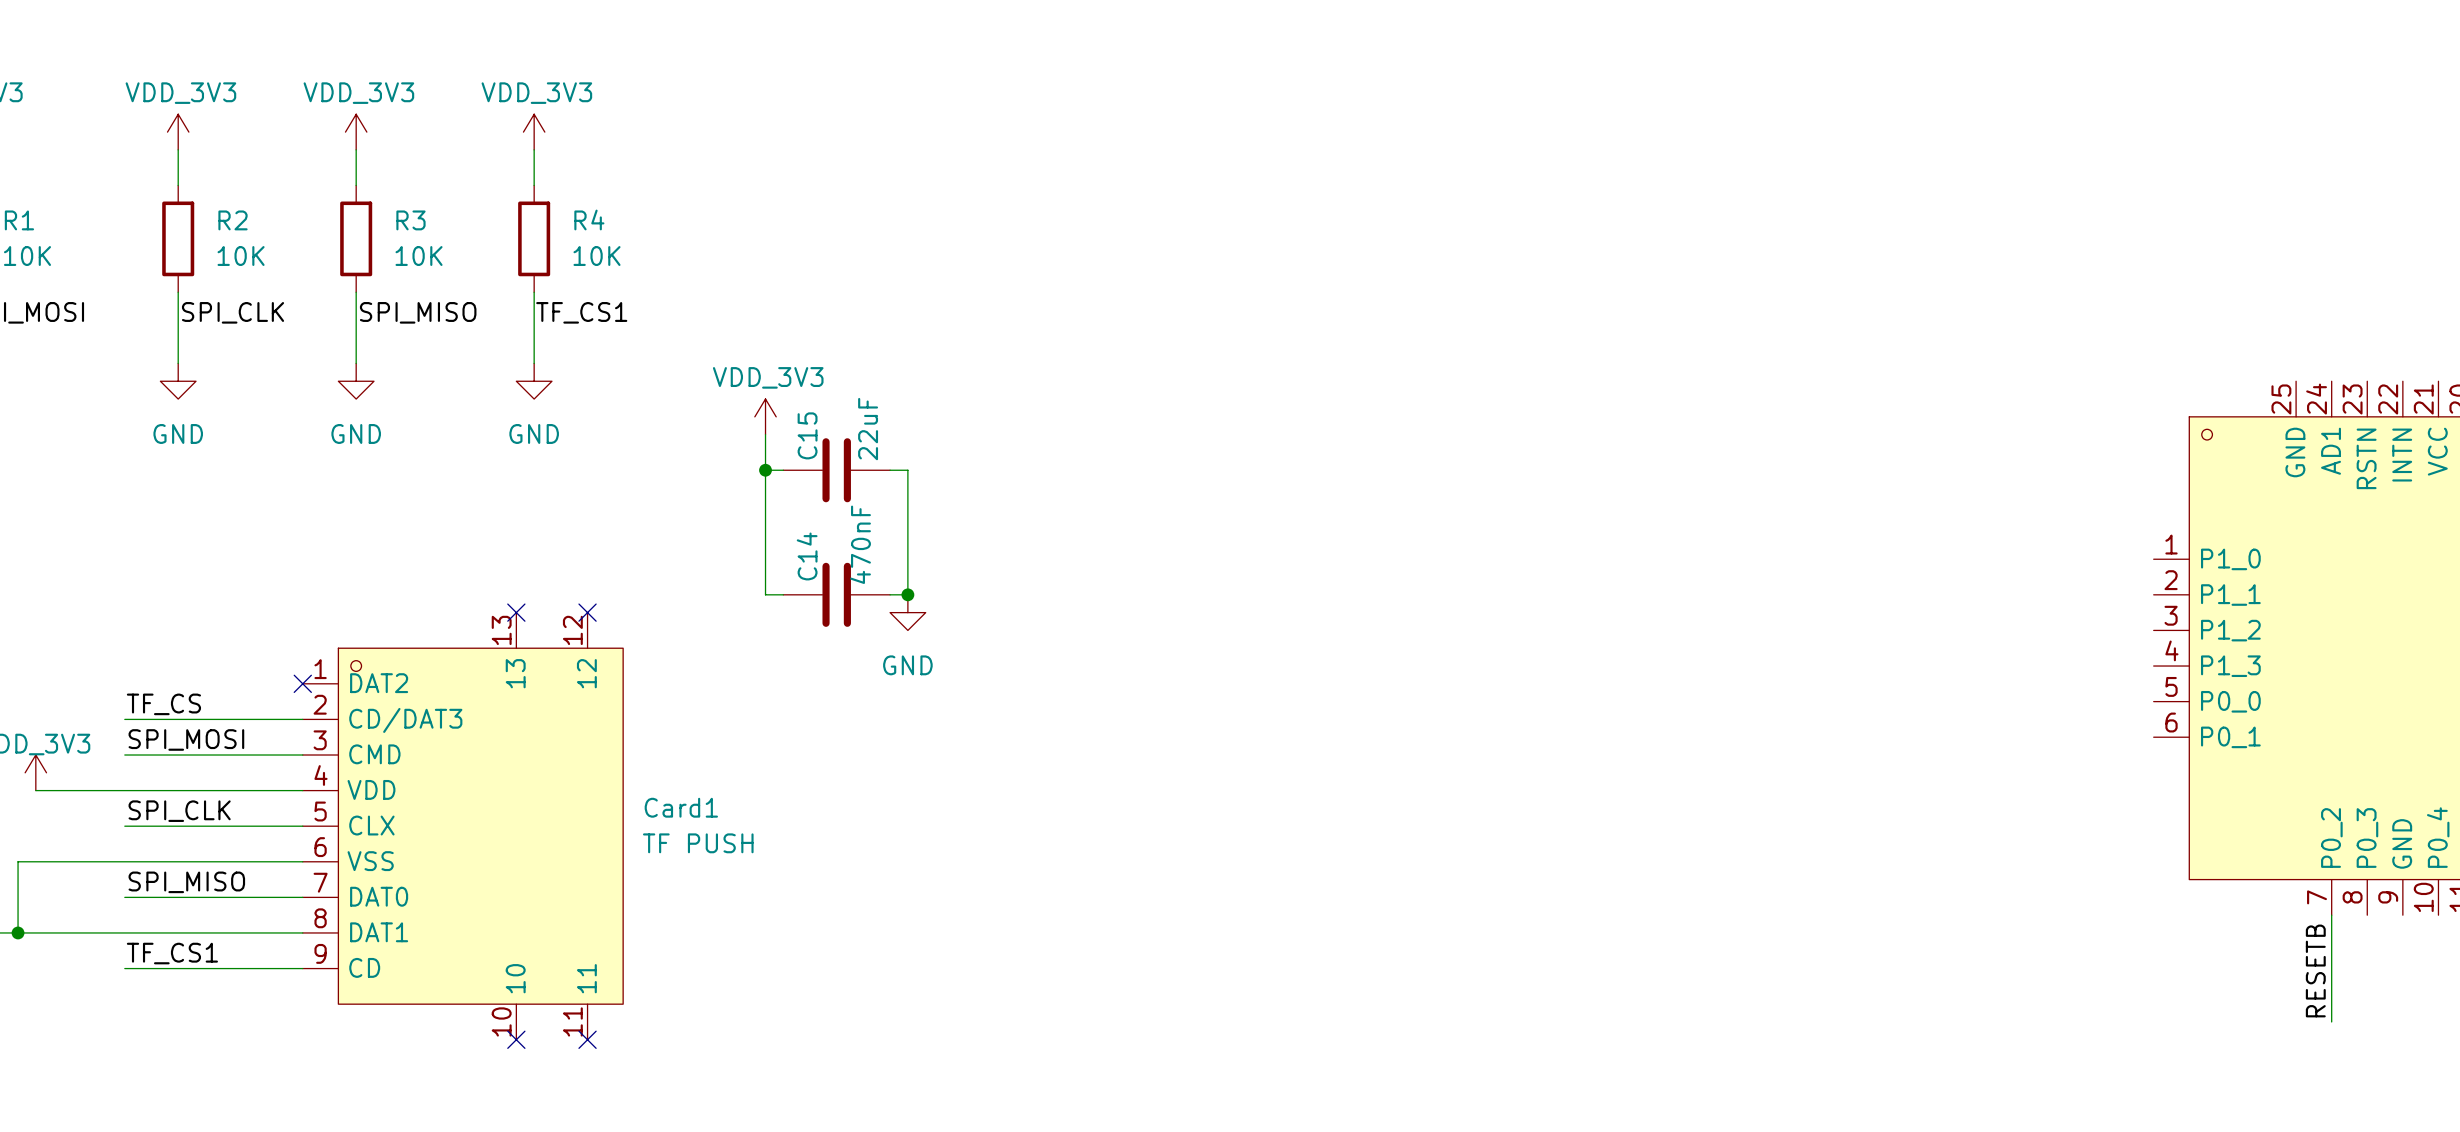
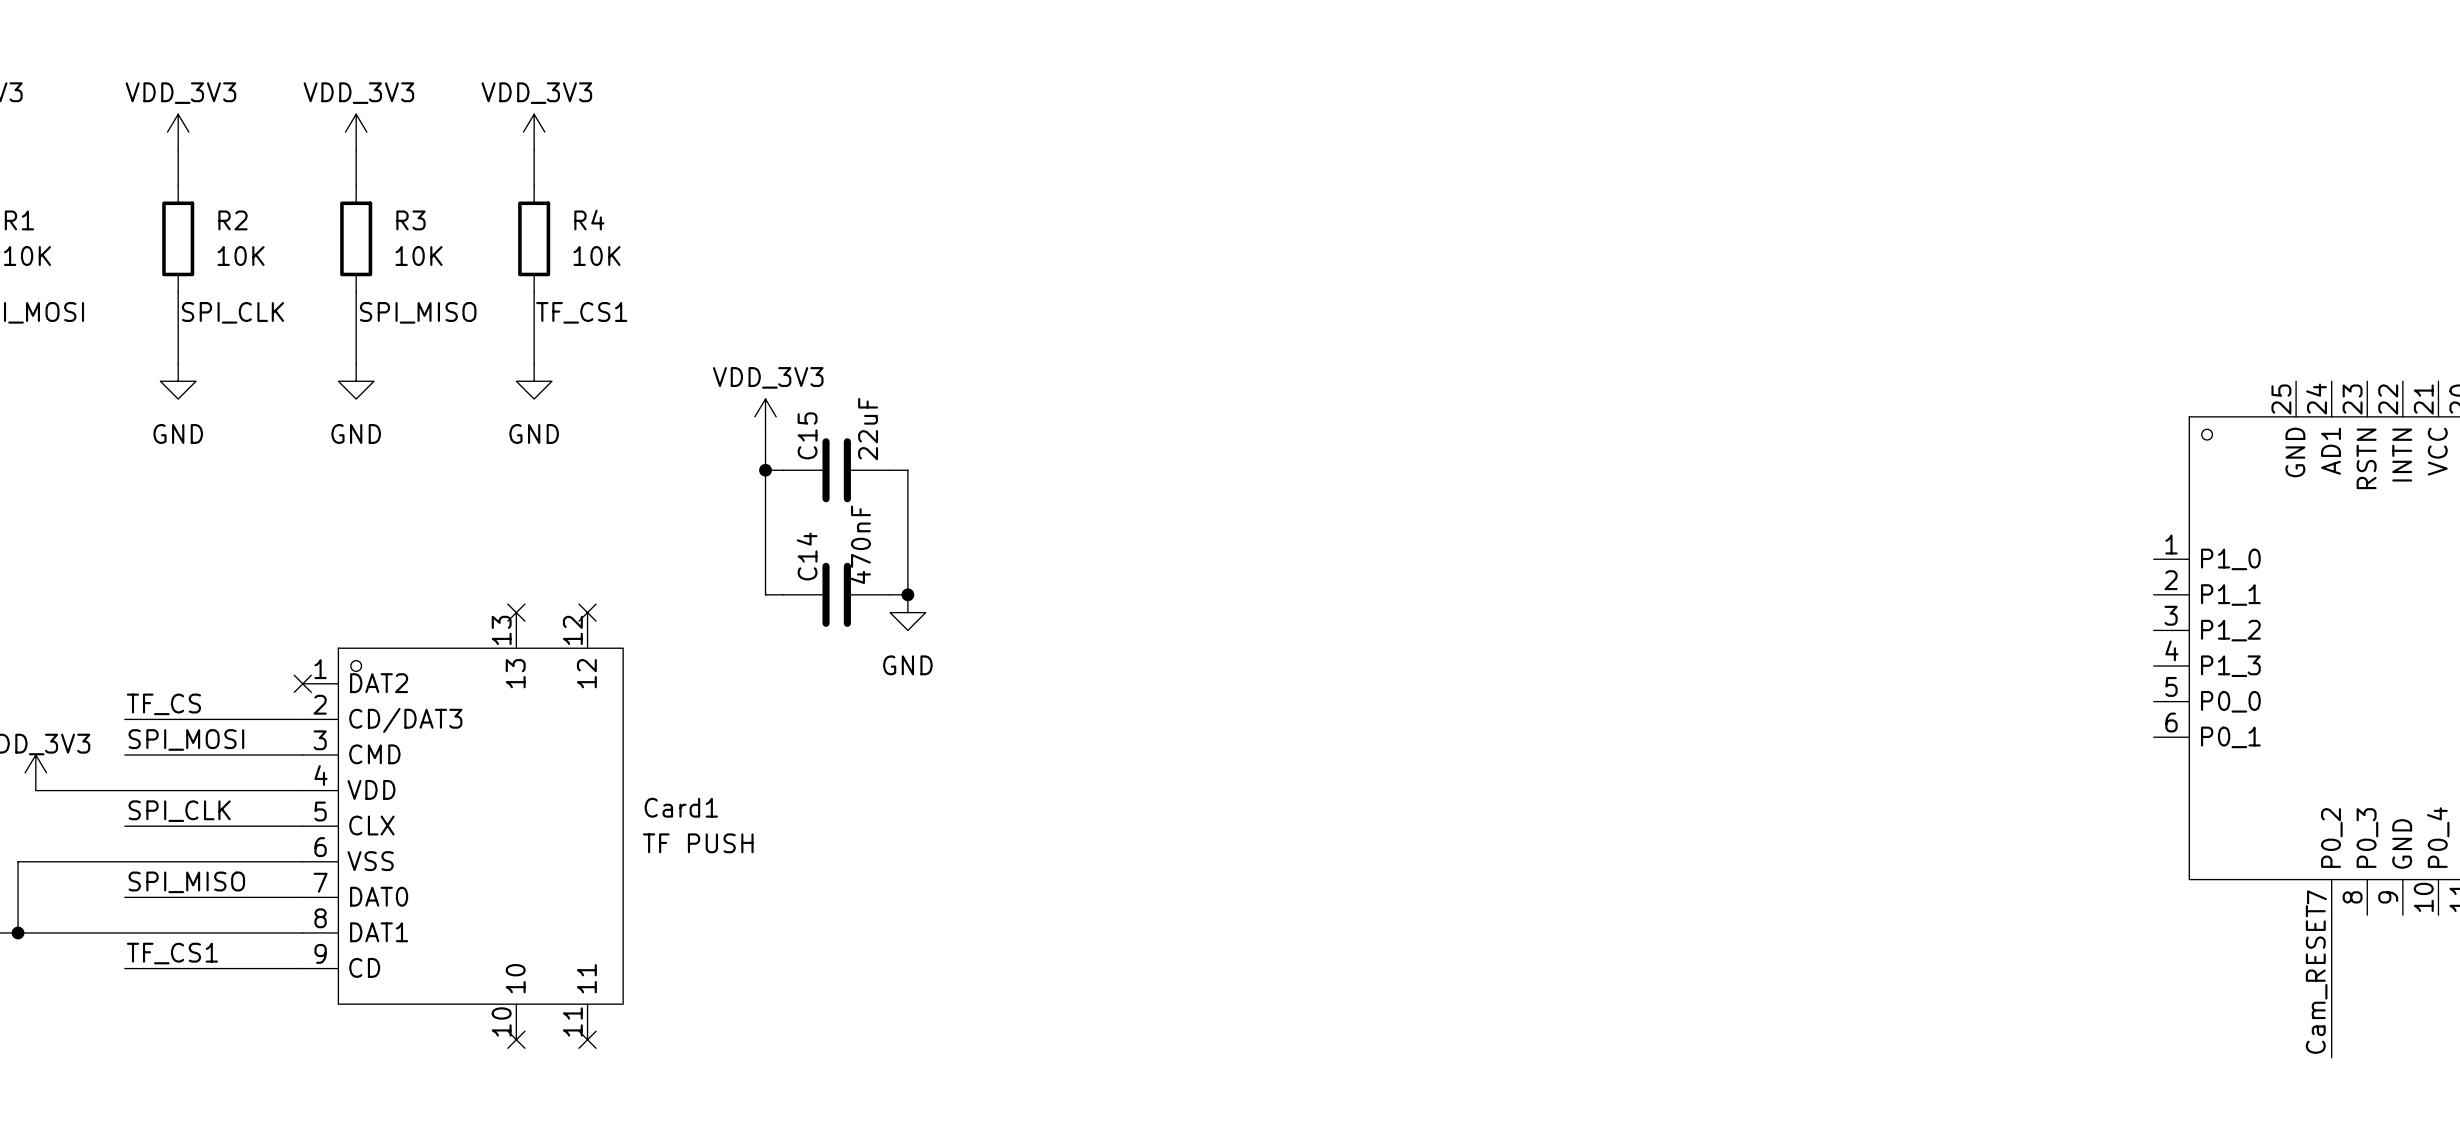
label: RESETB (2315, 970) -> Cam_RESET (2316, 979)
wire: none -> (2331, 1021) (2331, 1057)

